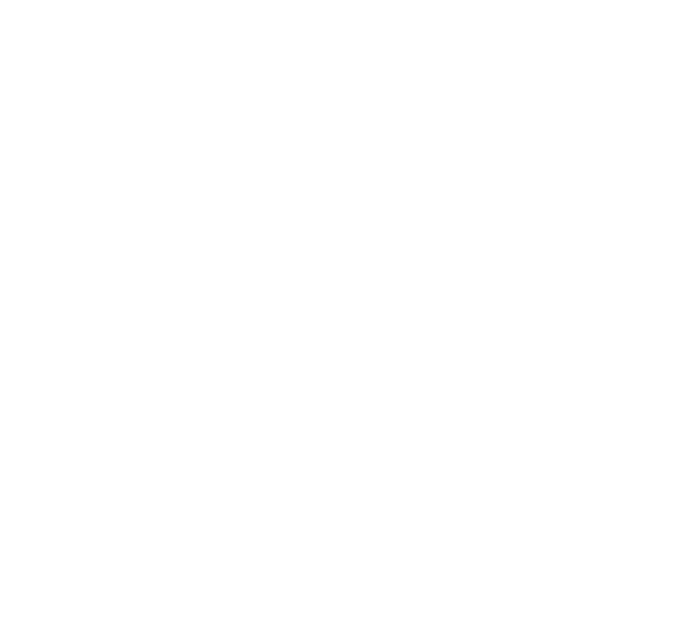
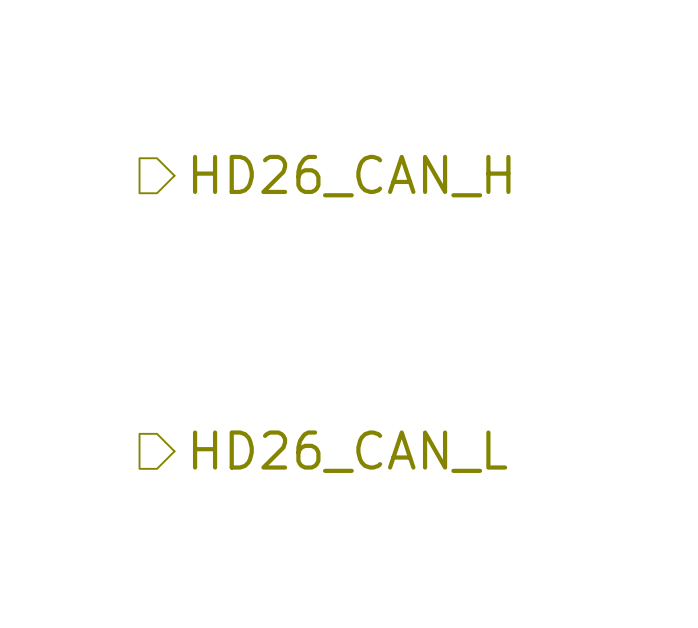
hierarchical label: none -> HD26_CAN_H (351, 176)
hierarchical label: none -> HD26_CAN_L (350, 451)

